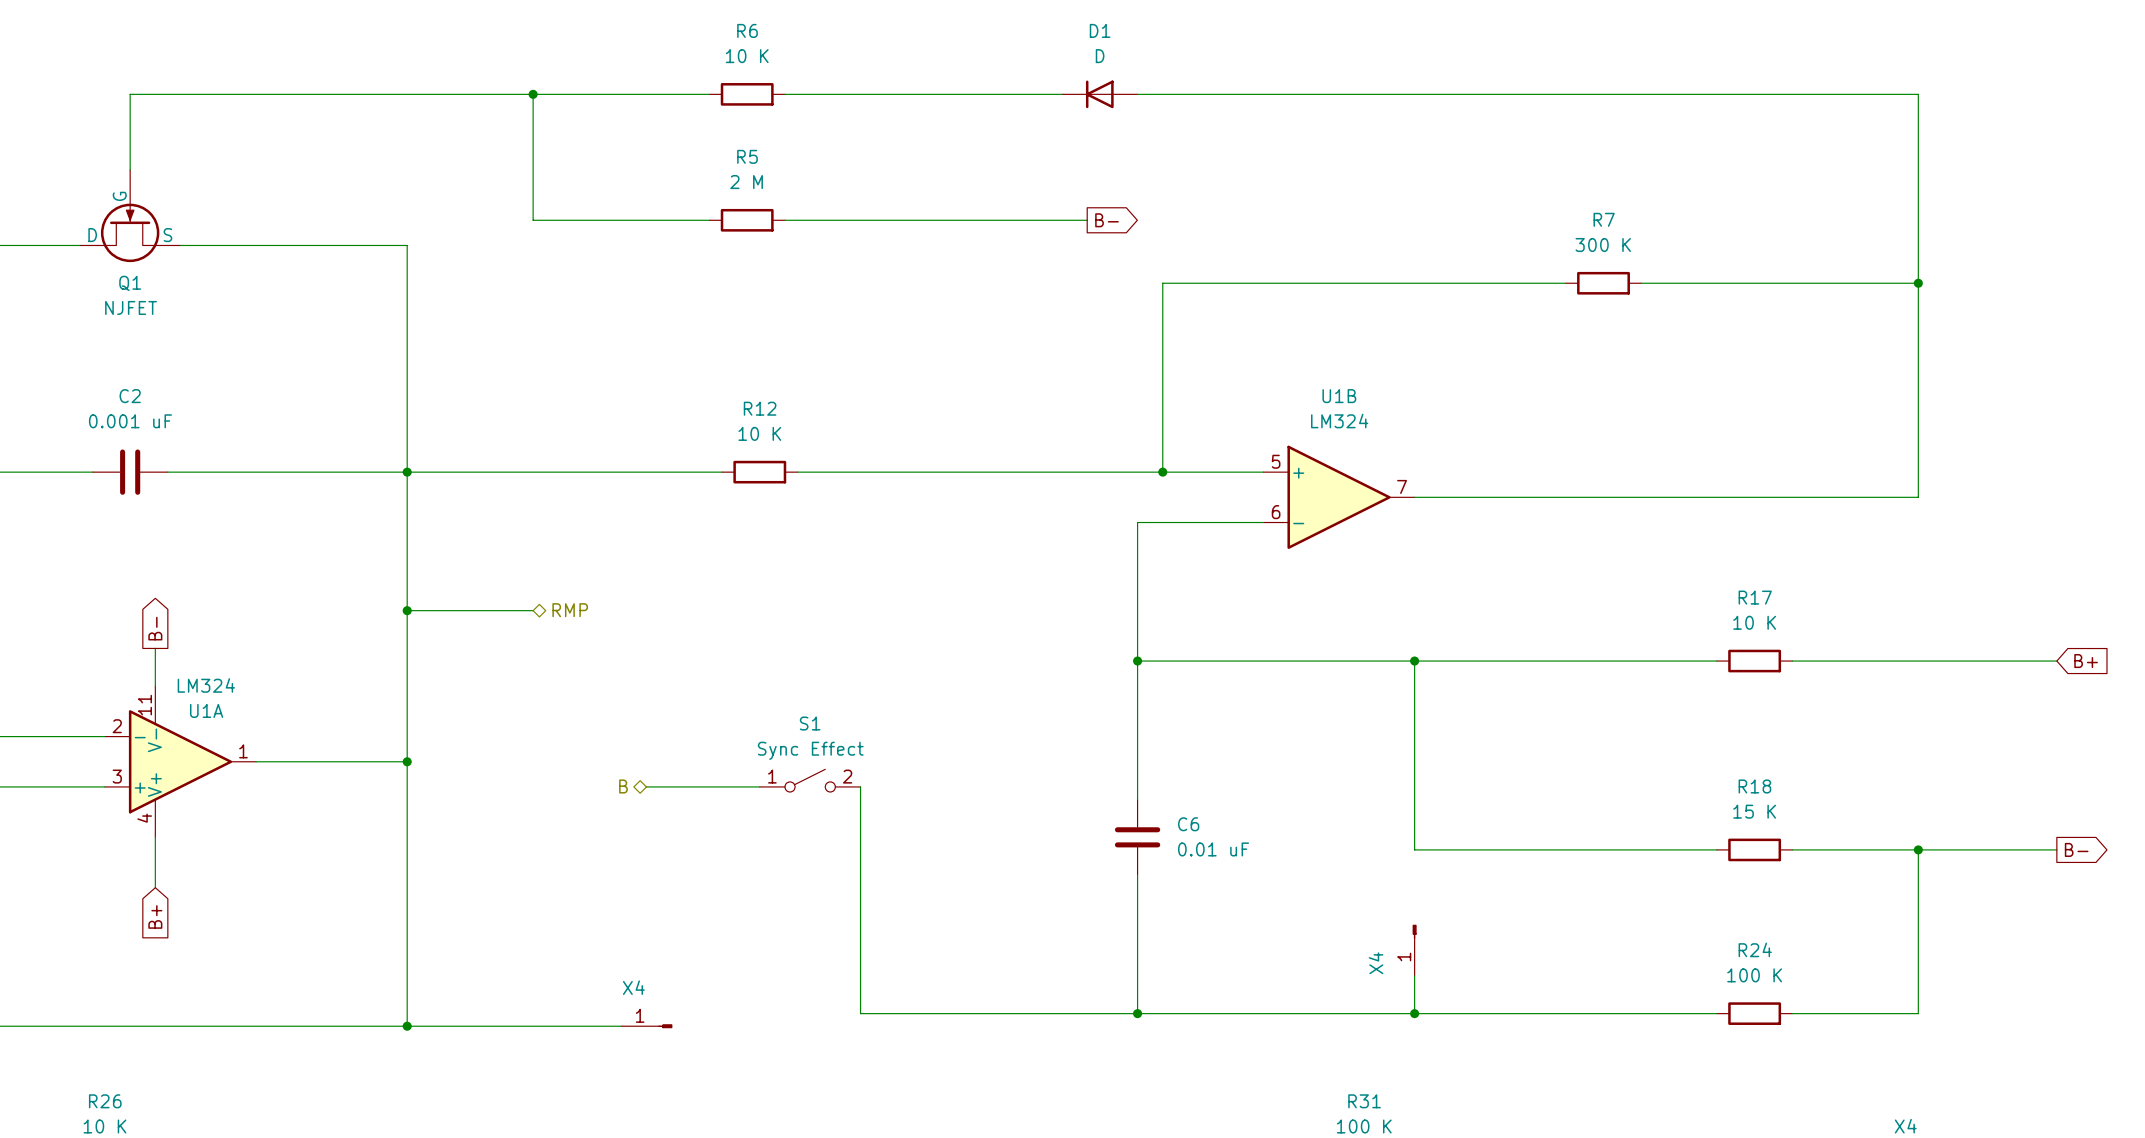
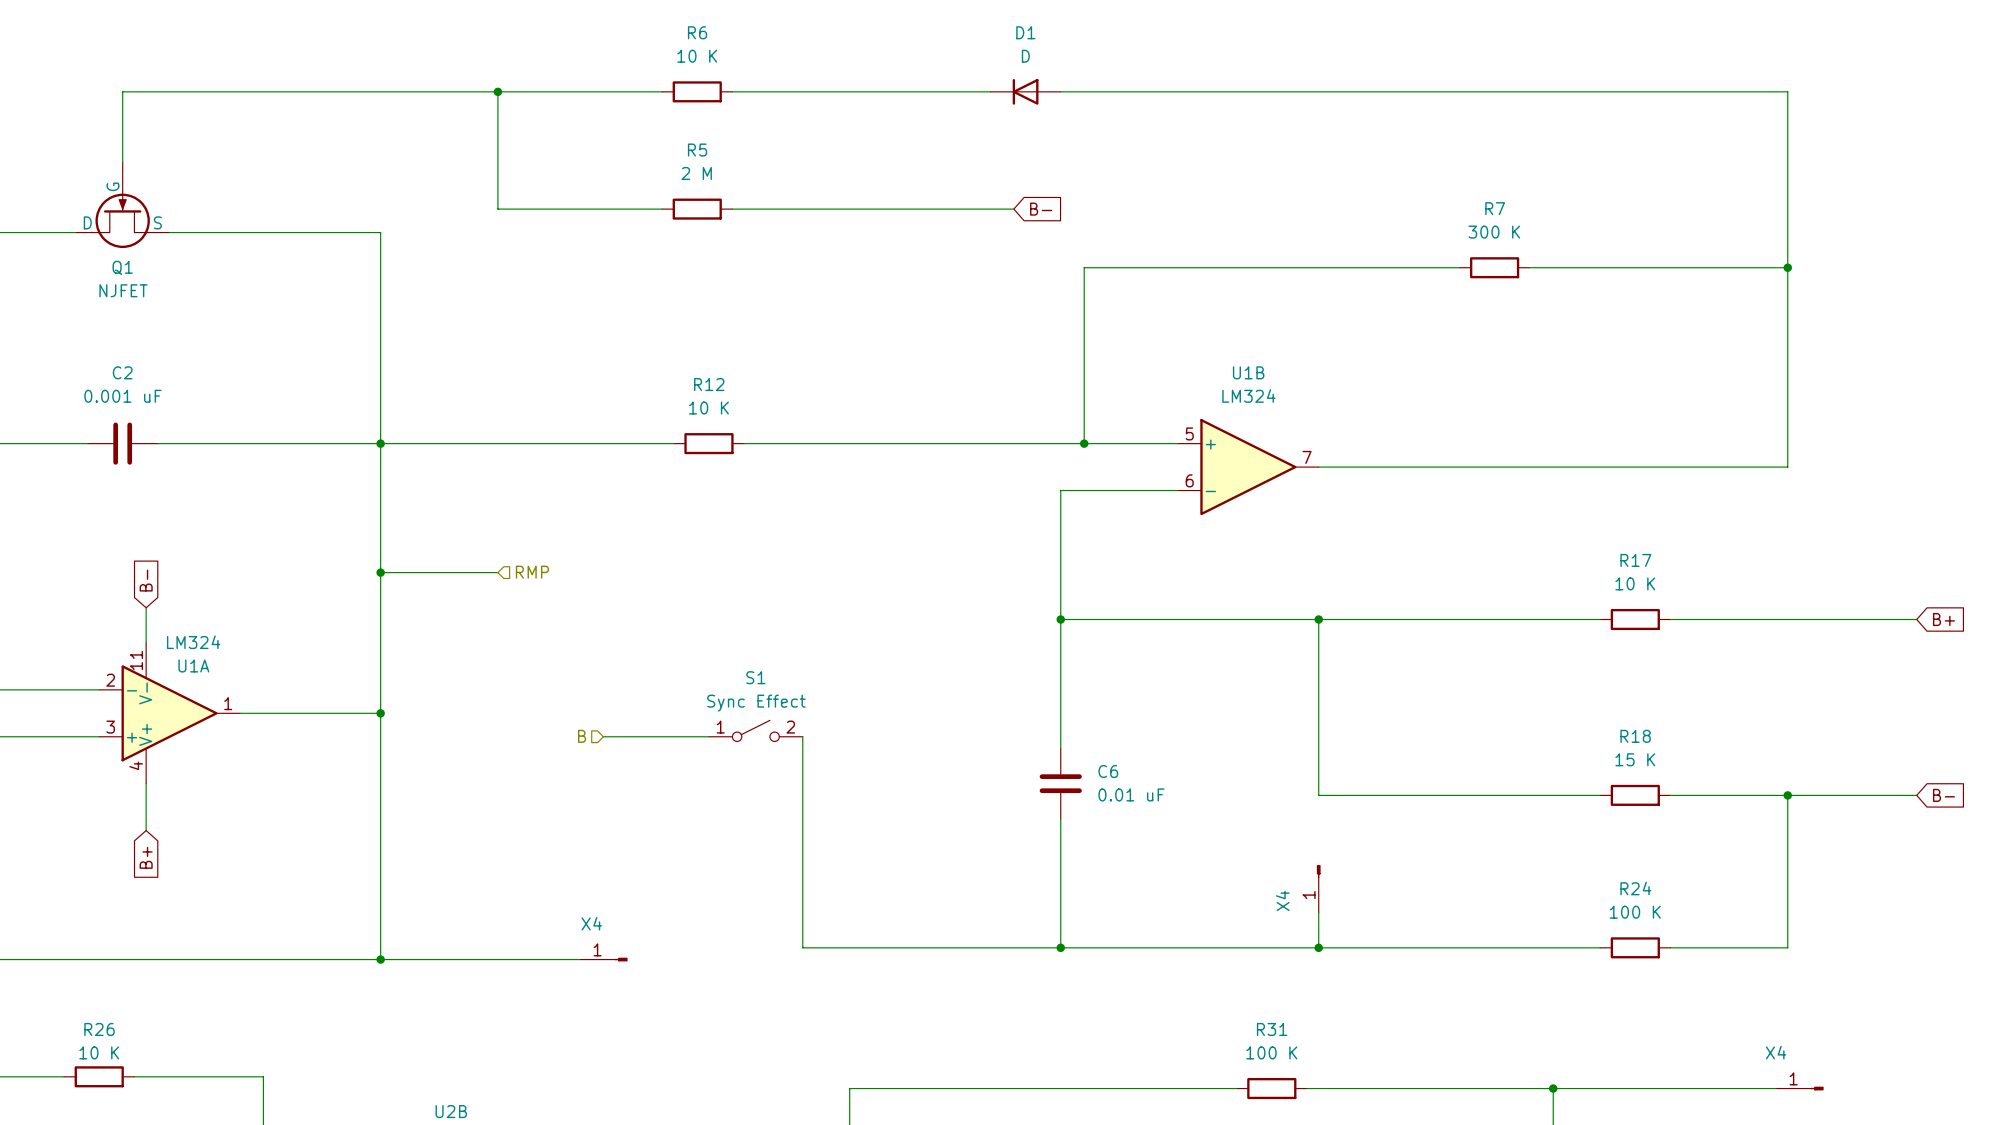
global label shape: output (1107, 220) -> input (1041, 209)
hierarchical label shape: bidirectional (570, 610) -> input (532, 572)
global label shape: output (155, 628) -> input (146, 580)
hierarchical label shape: bidirectional (623, 786) -> input (582, 736)
global label shape: output (2076, 849) -> input (1943, 795)

